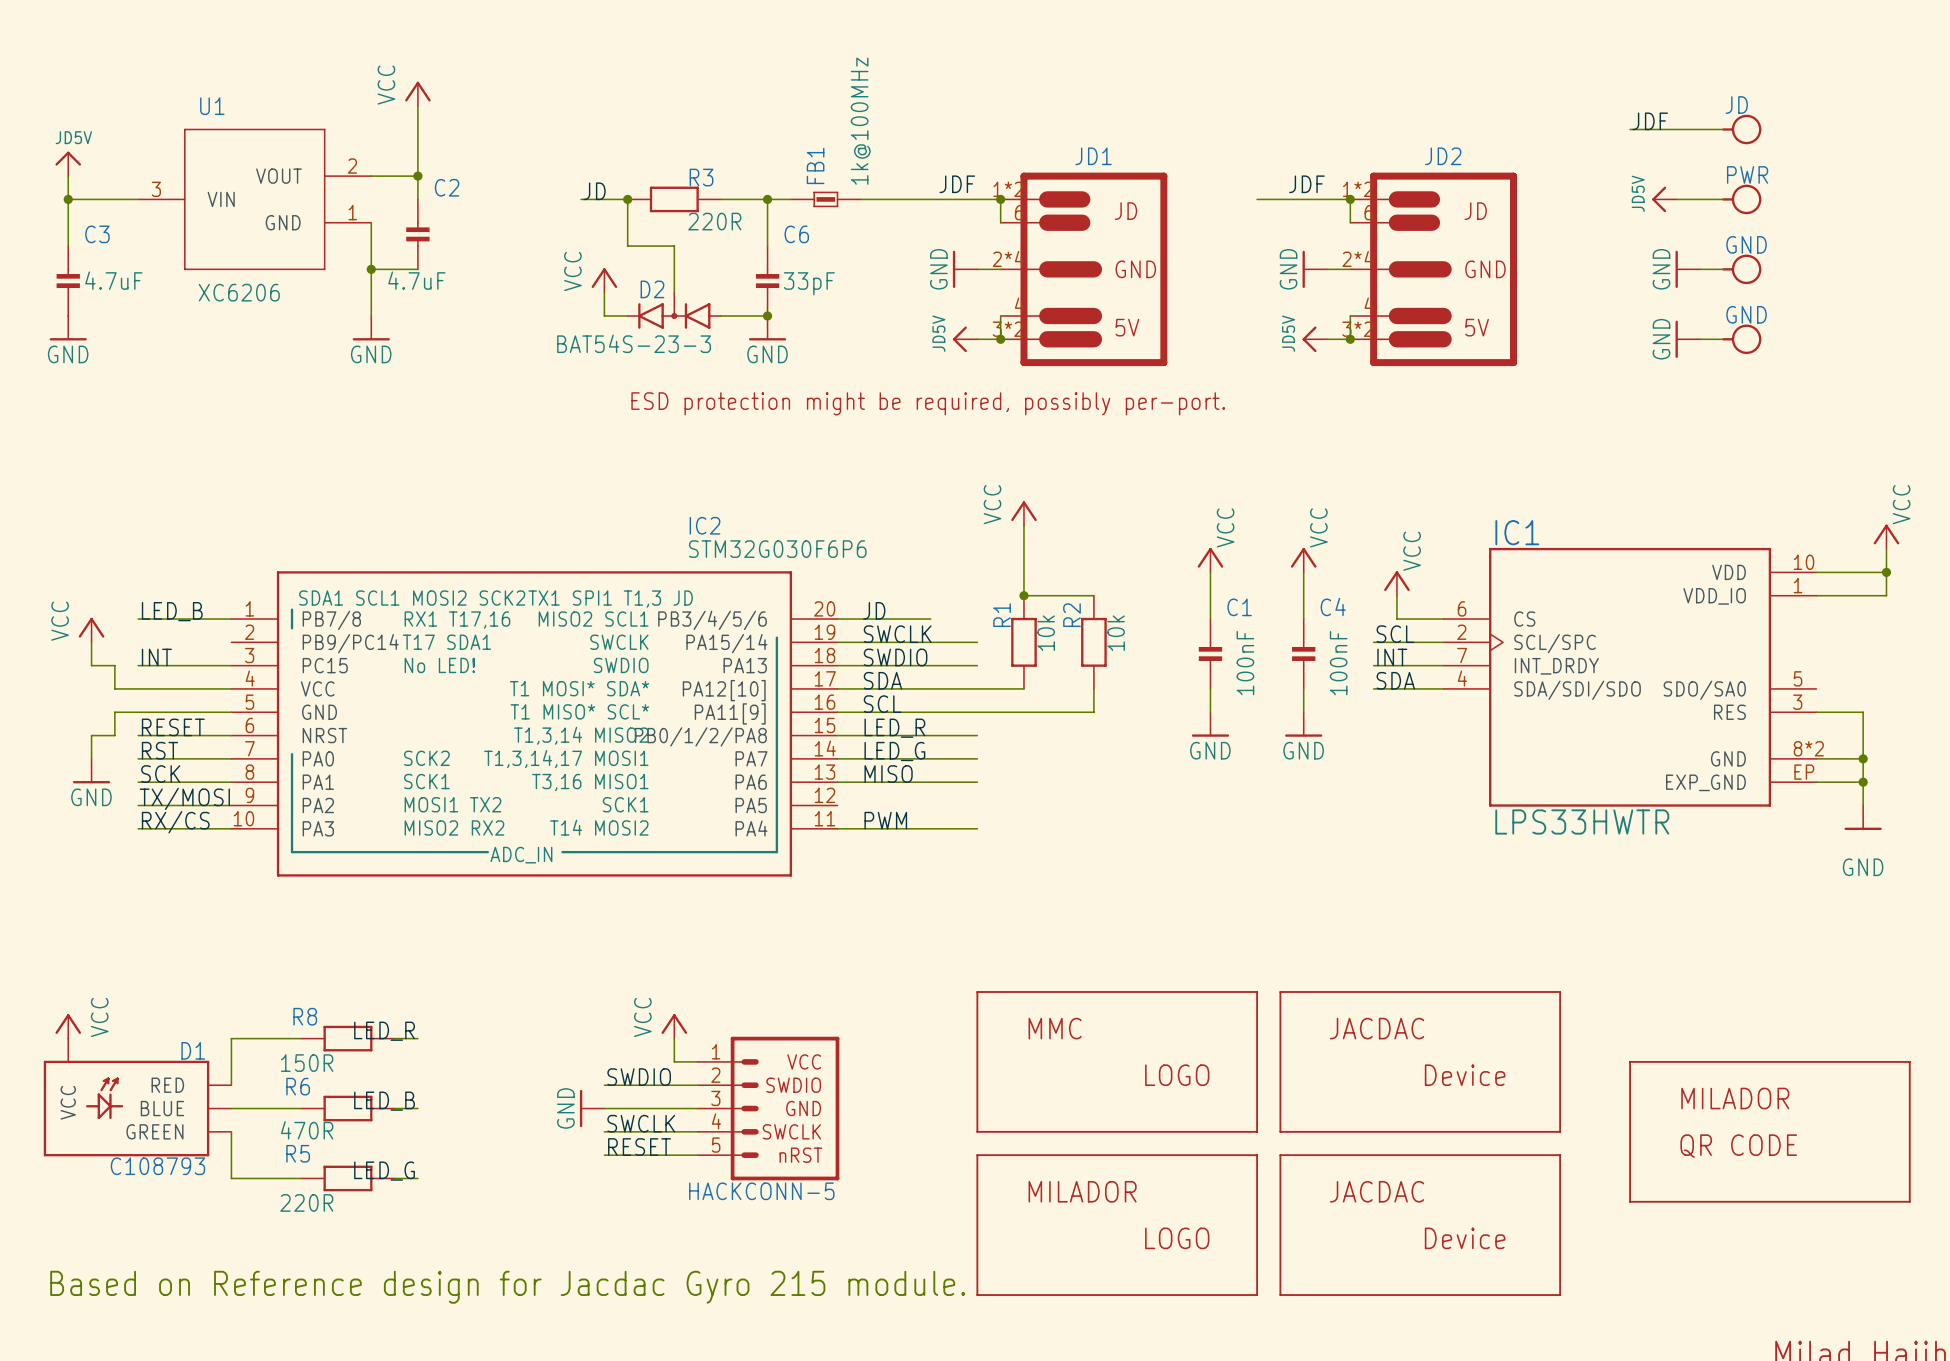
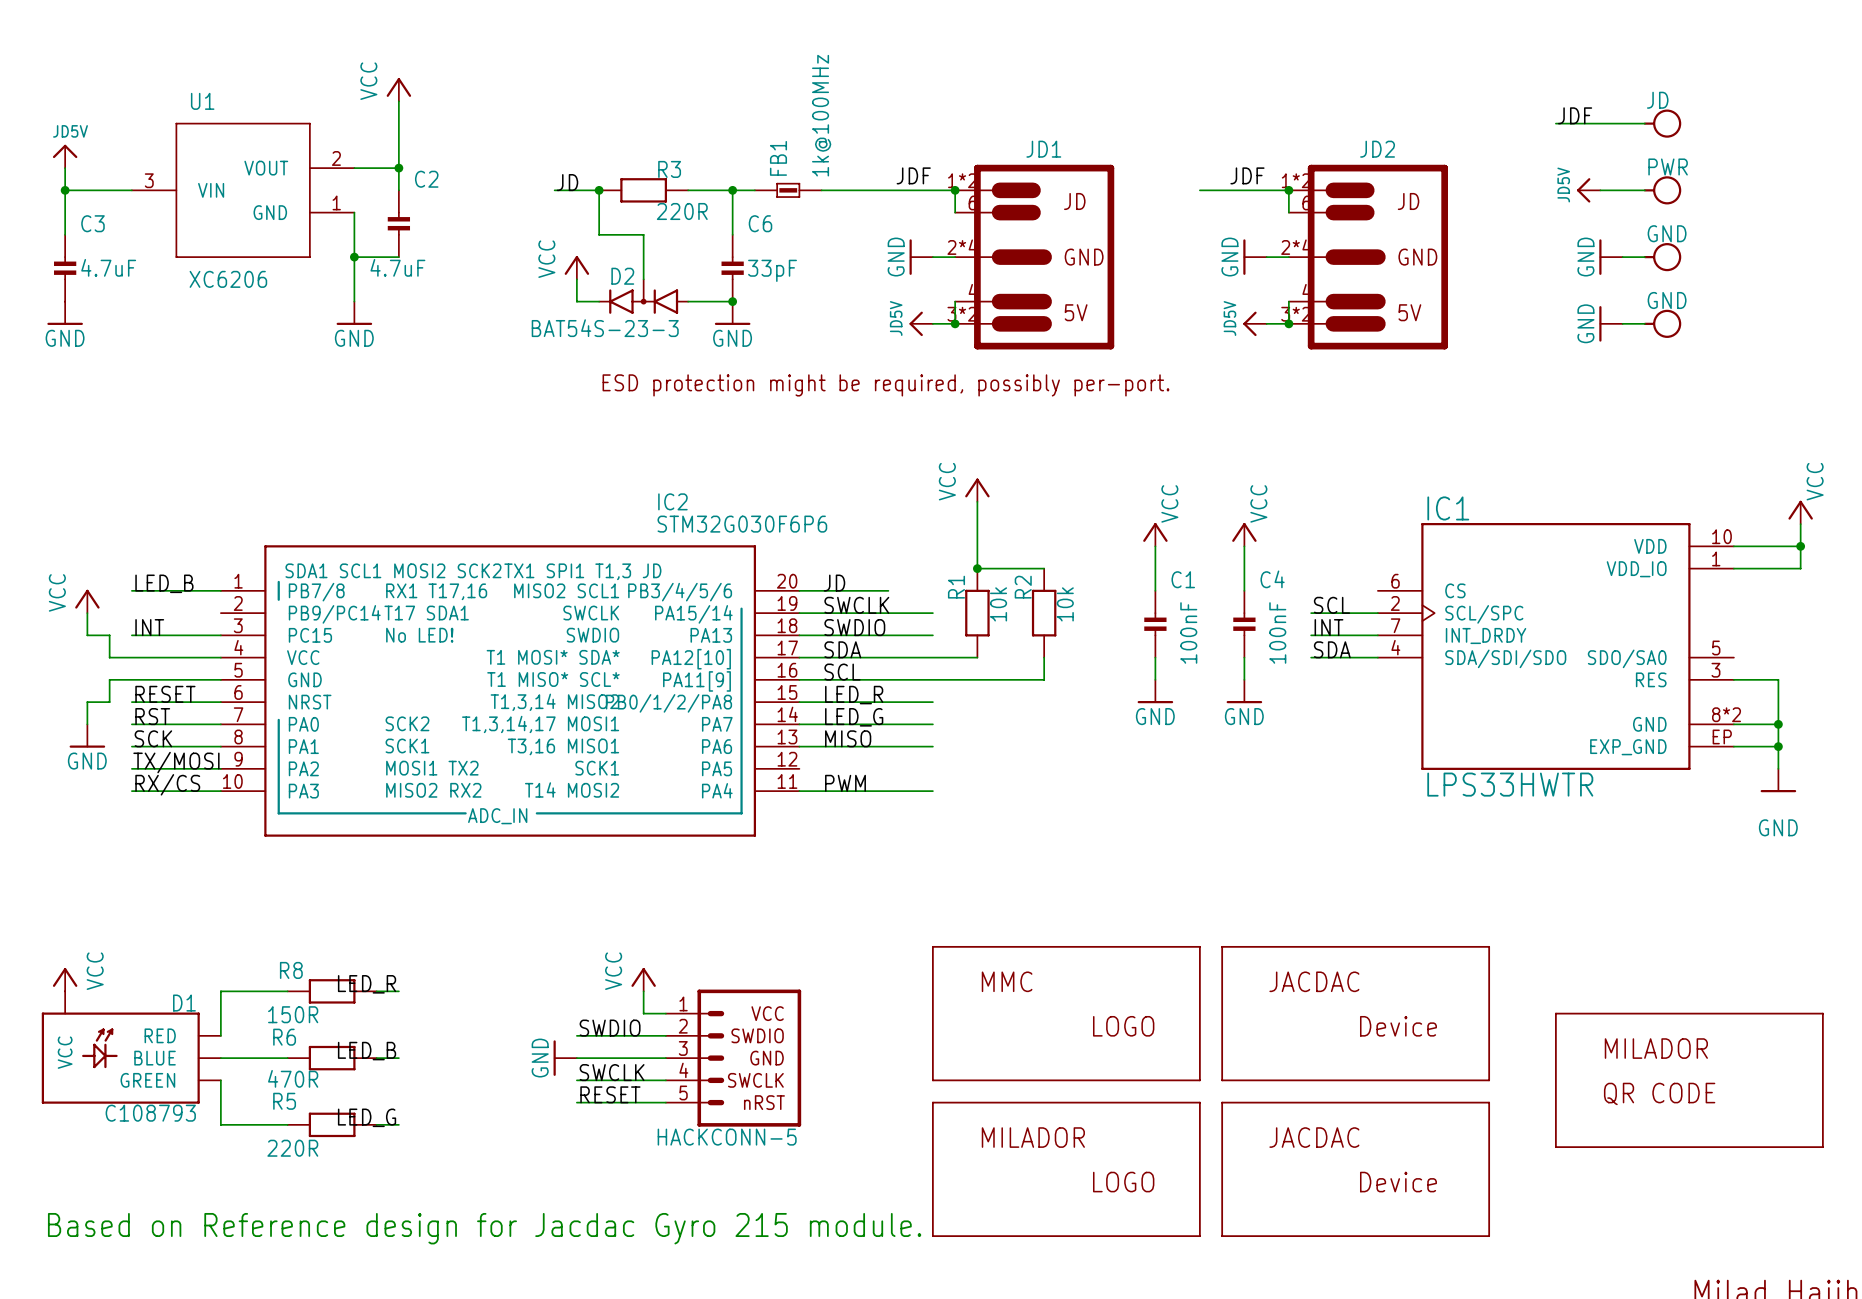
power symbol: VCC (1396, 583) -> none
wire: (1396, 595) (1396, 619) (1443, 619) -> none

